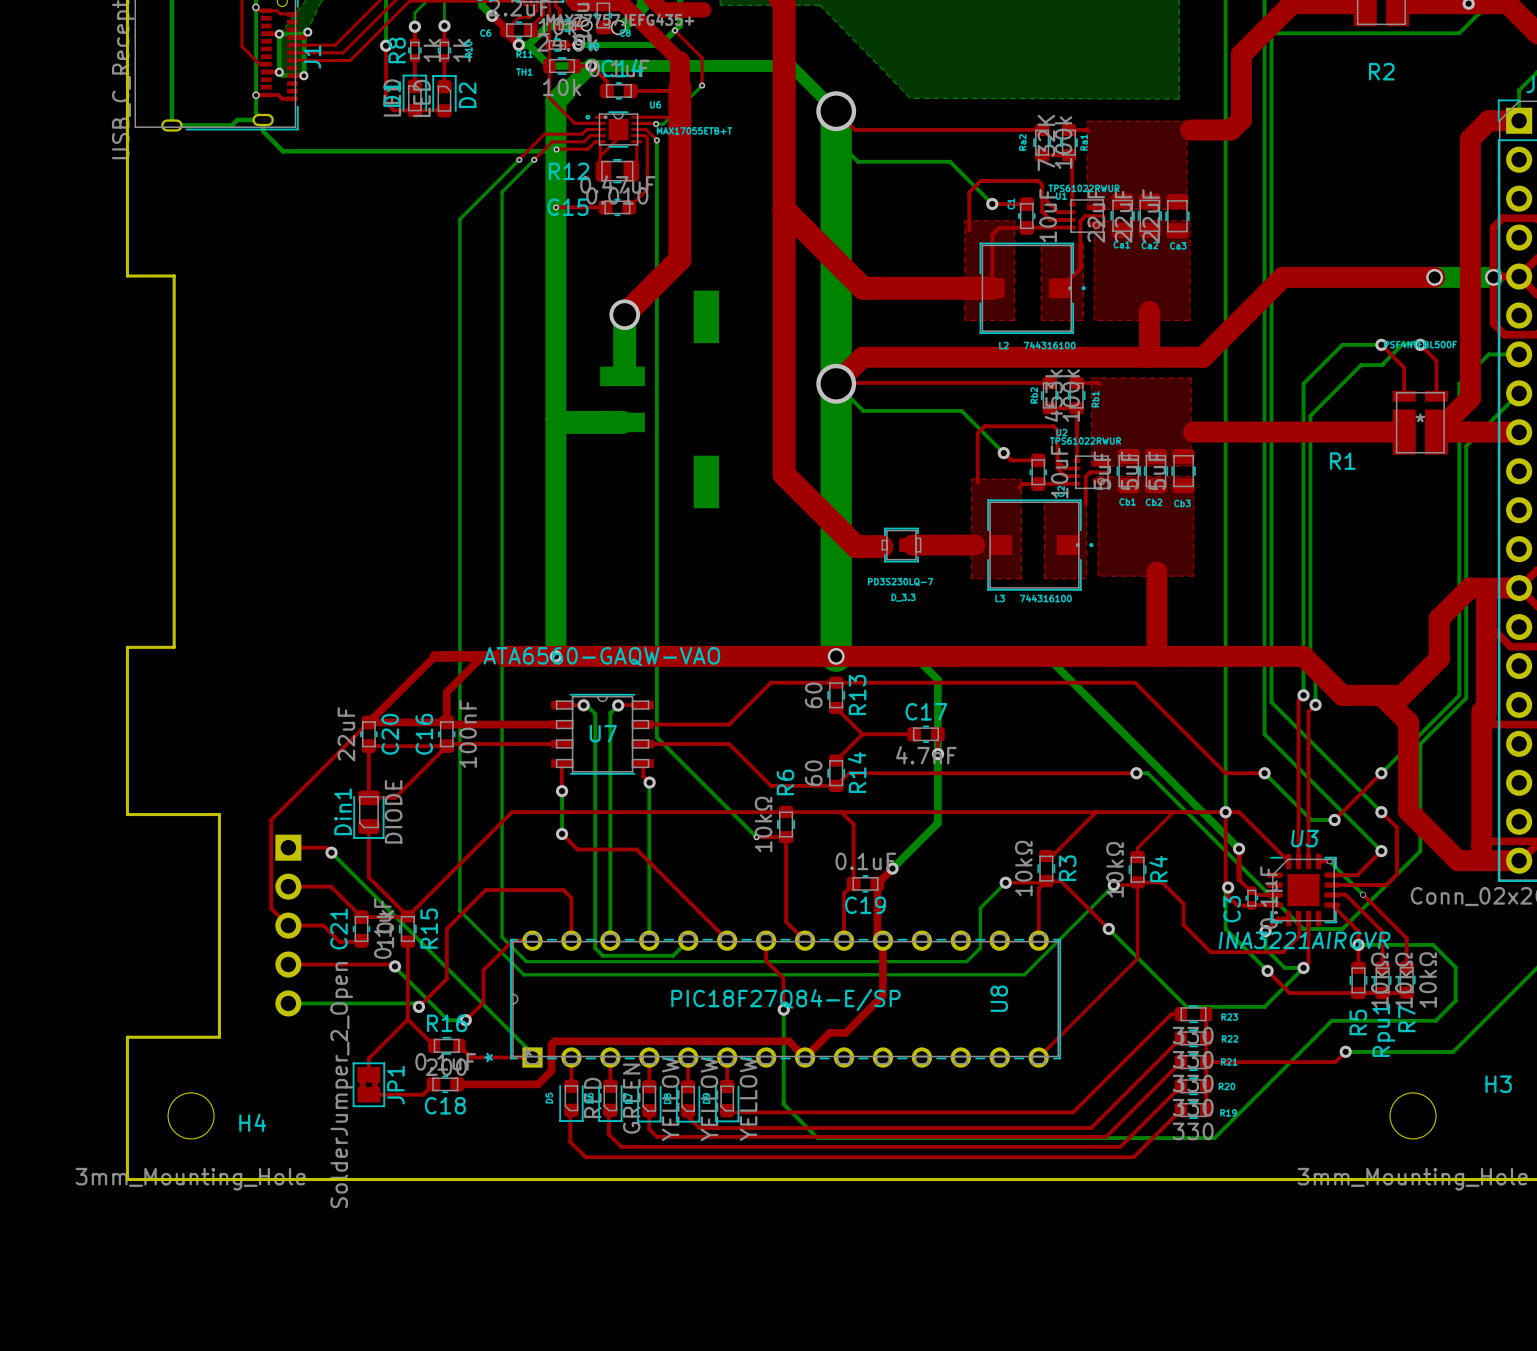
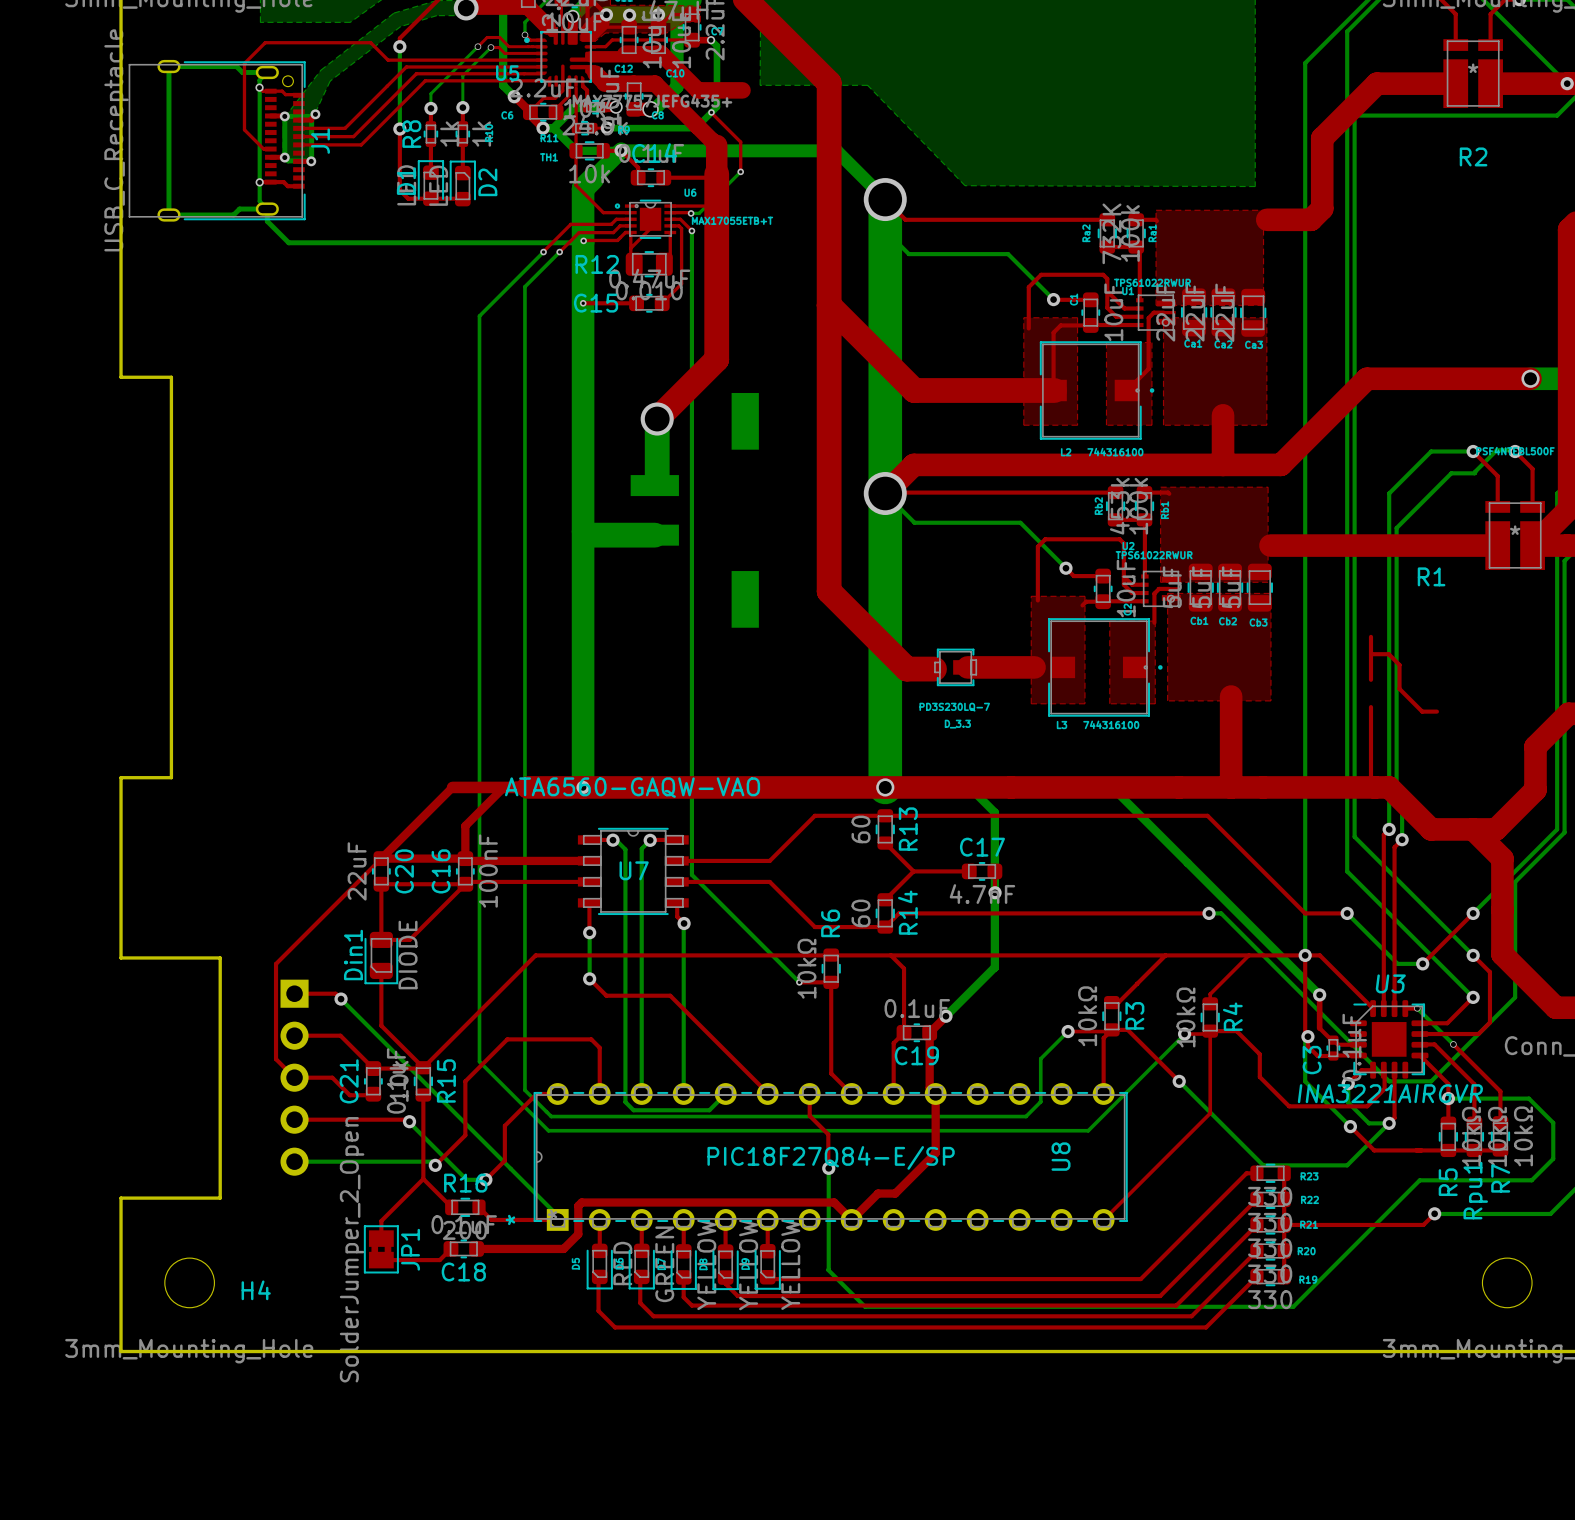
top track: none -> (1370, 636) (1370, 679)
top track: none -> (1370, 654) (1388, 654) (1399, 664) (1399, 688) (1422, 711) (1436, 711)
top track: none -> (1370, 707) (1370, 783) (1374, 787)

